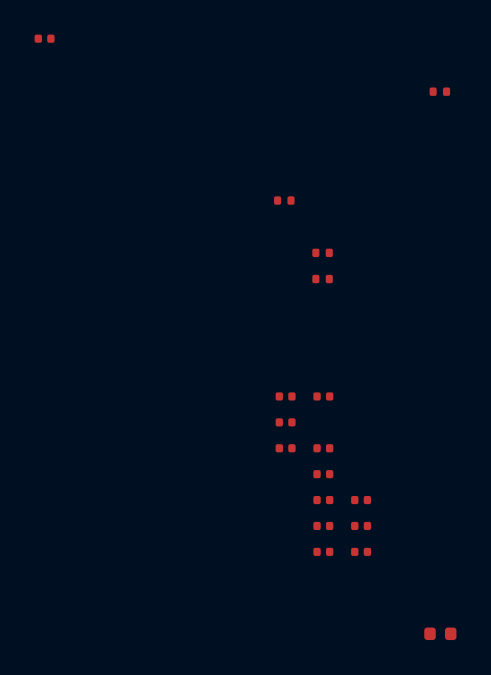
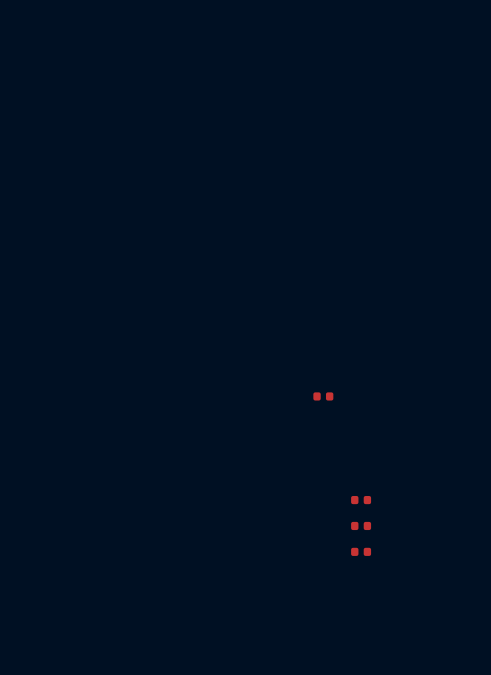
part: (44, 38) -> none
part: (439, 91) -> none
part: (284, 200) -> none
part: (322, 252) -> none
part: (322, 279) -> none
part: (285, 396) -> none
part: (285, 422) -> none
part: (285, 448) -> none
part: (323, 448) -> none
part: (323, 474) -> none
part: (323, 500) -> none
part: (323, 525) -> none
part: (323, 551) -> none
part: (440, 633) -> none

